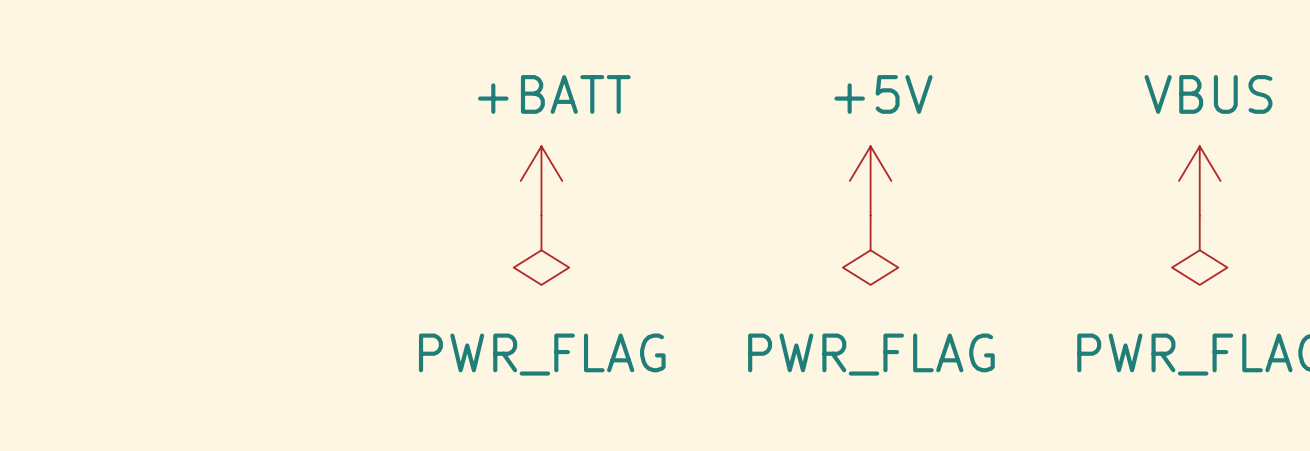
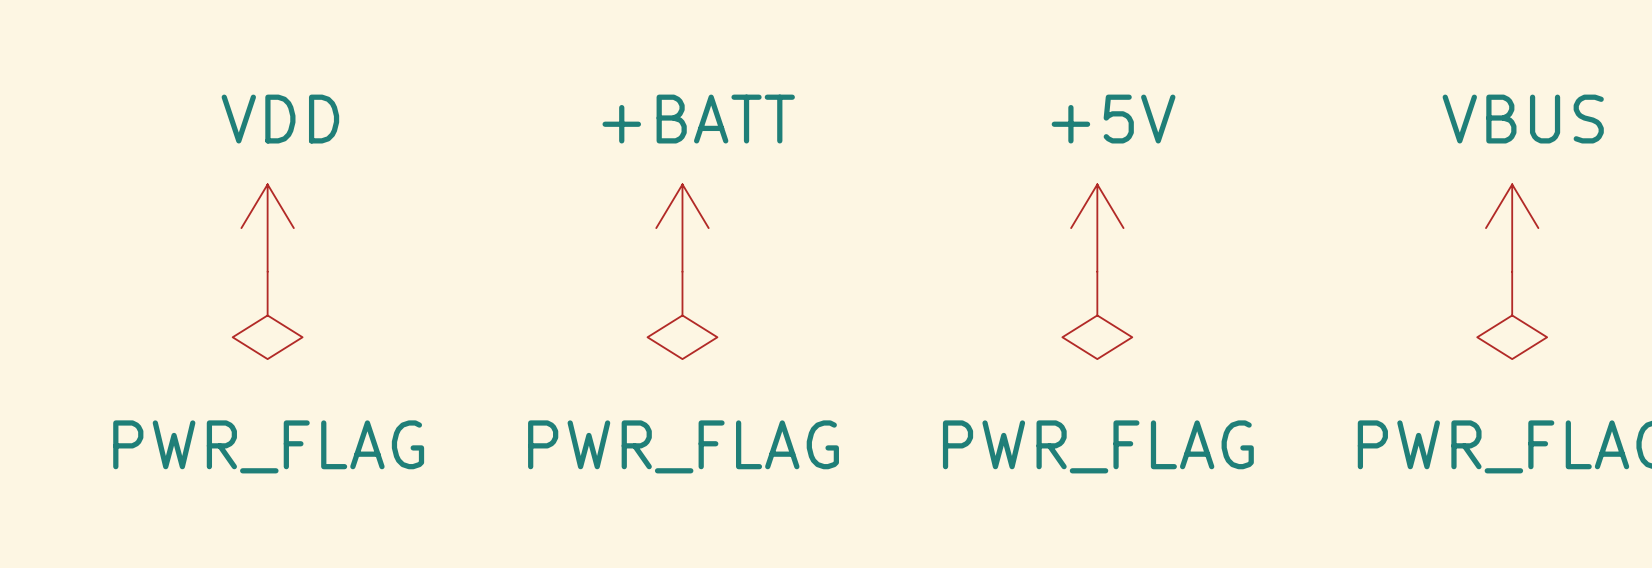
power symbol: none -> VDD (267, 228)
power symbol: none -> PWR_FLAG (267, 315)

